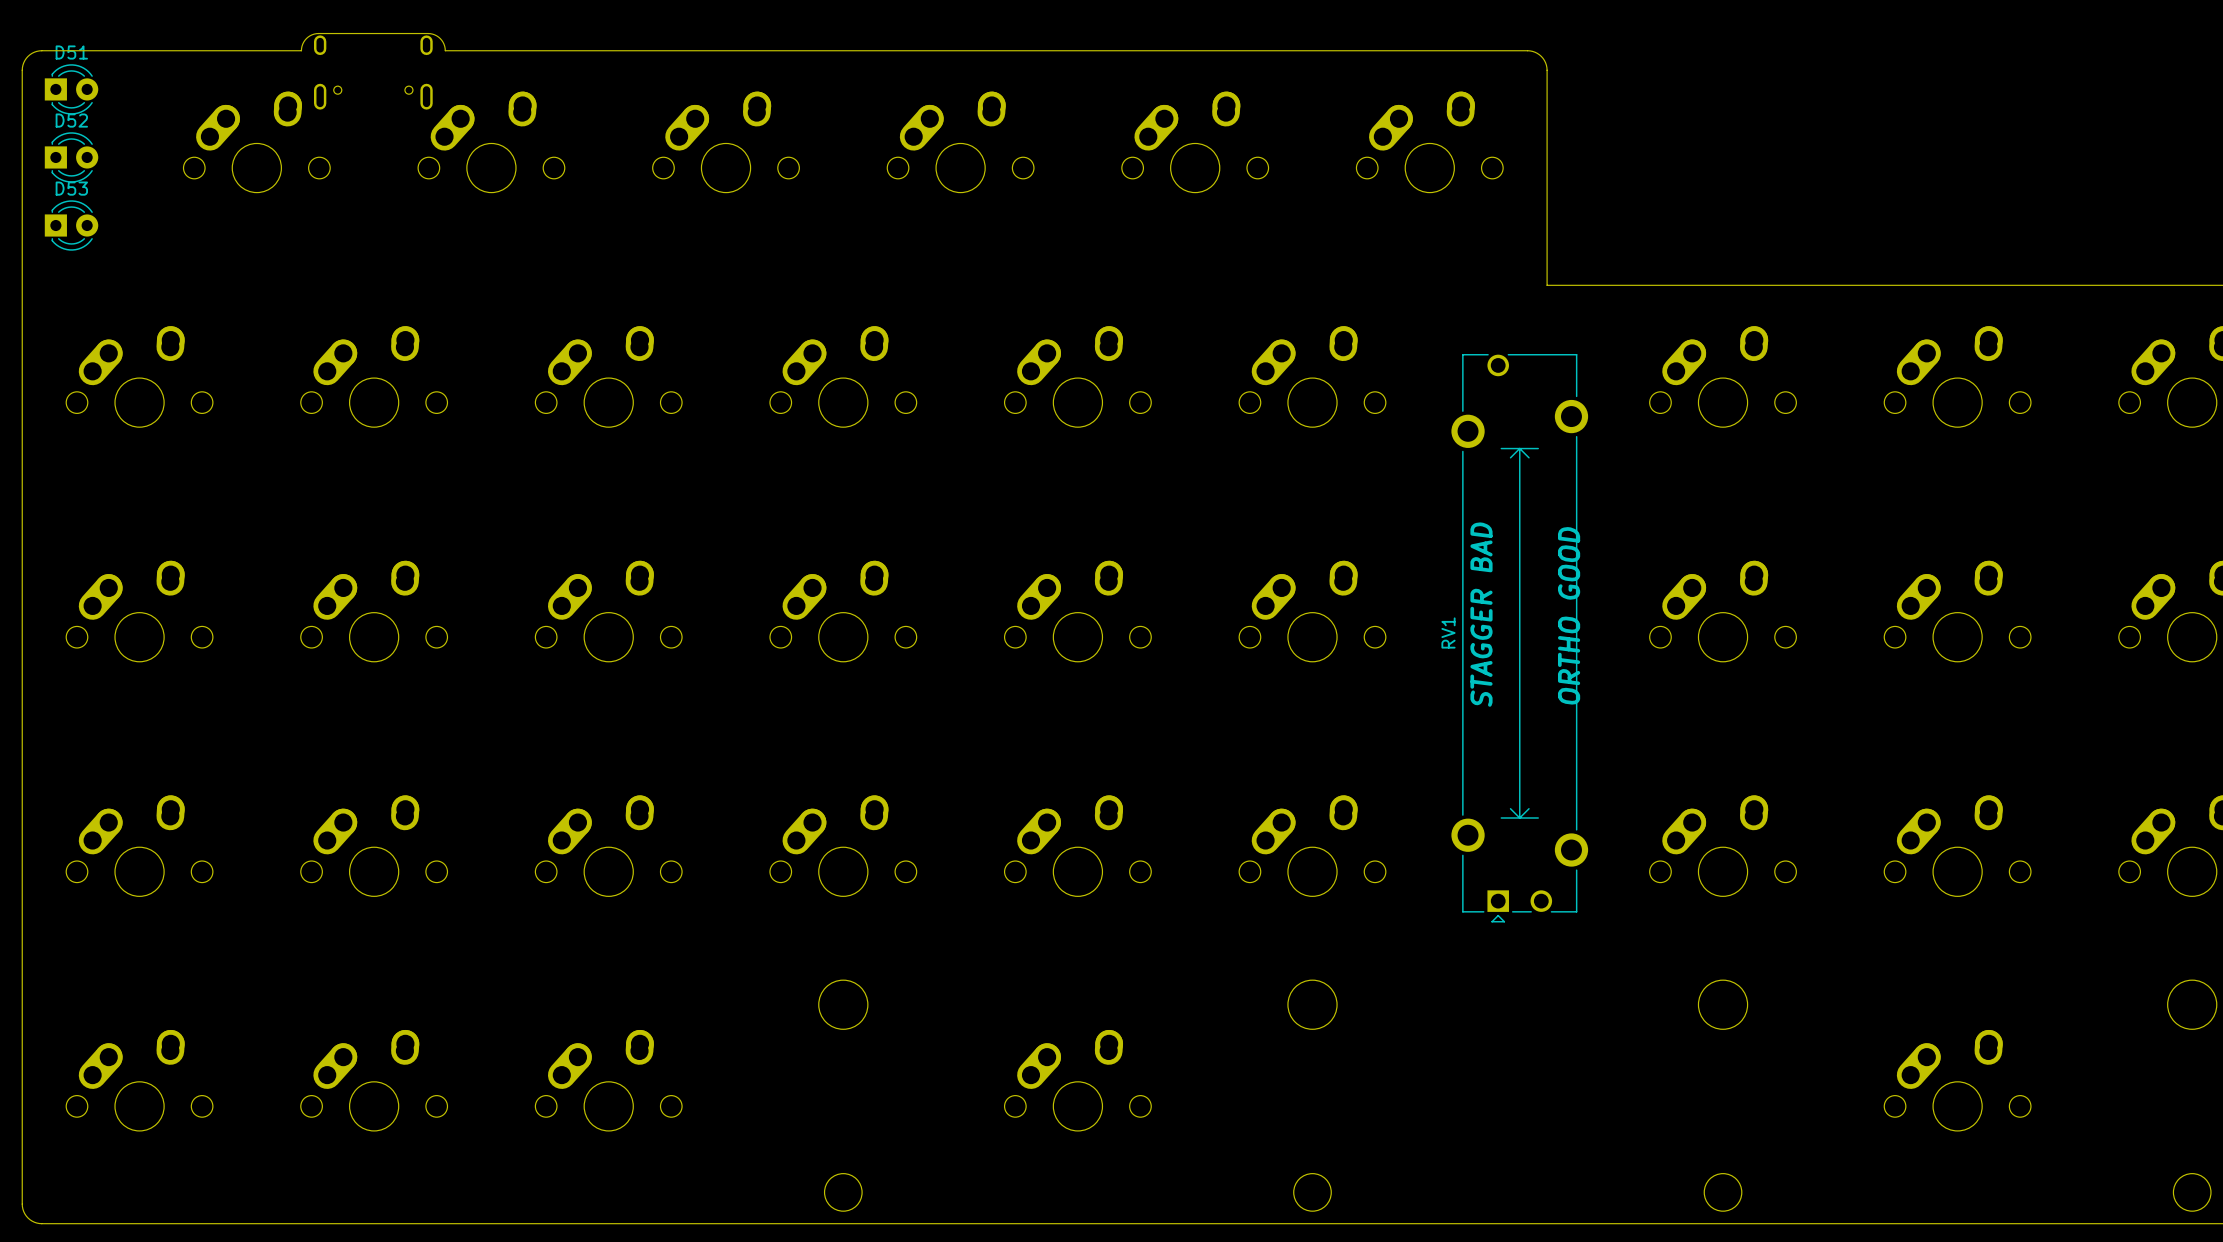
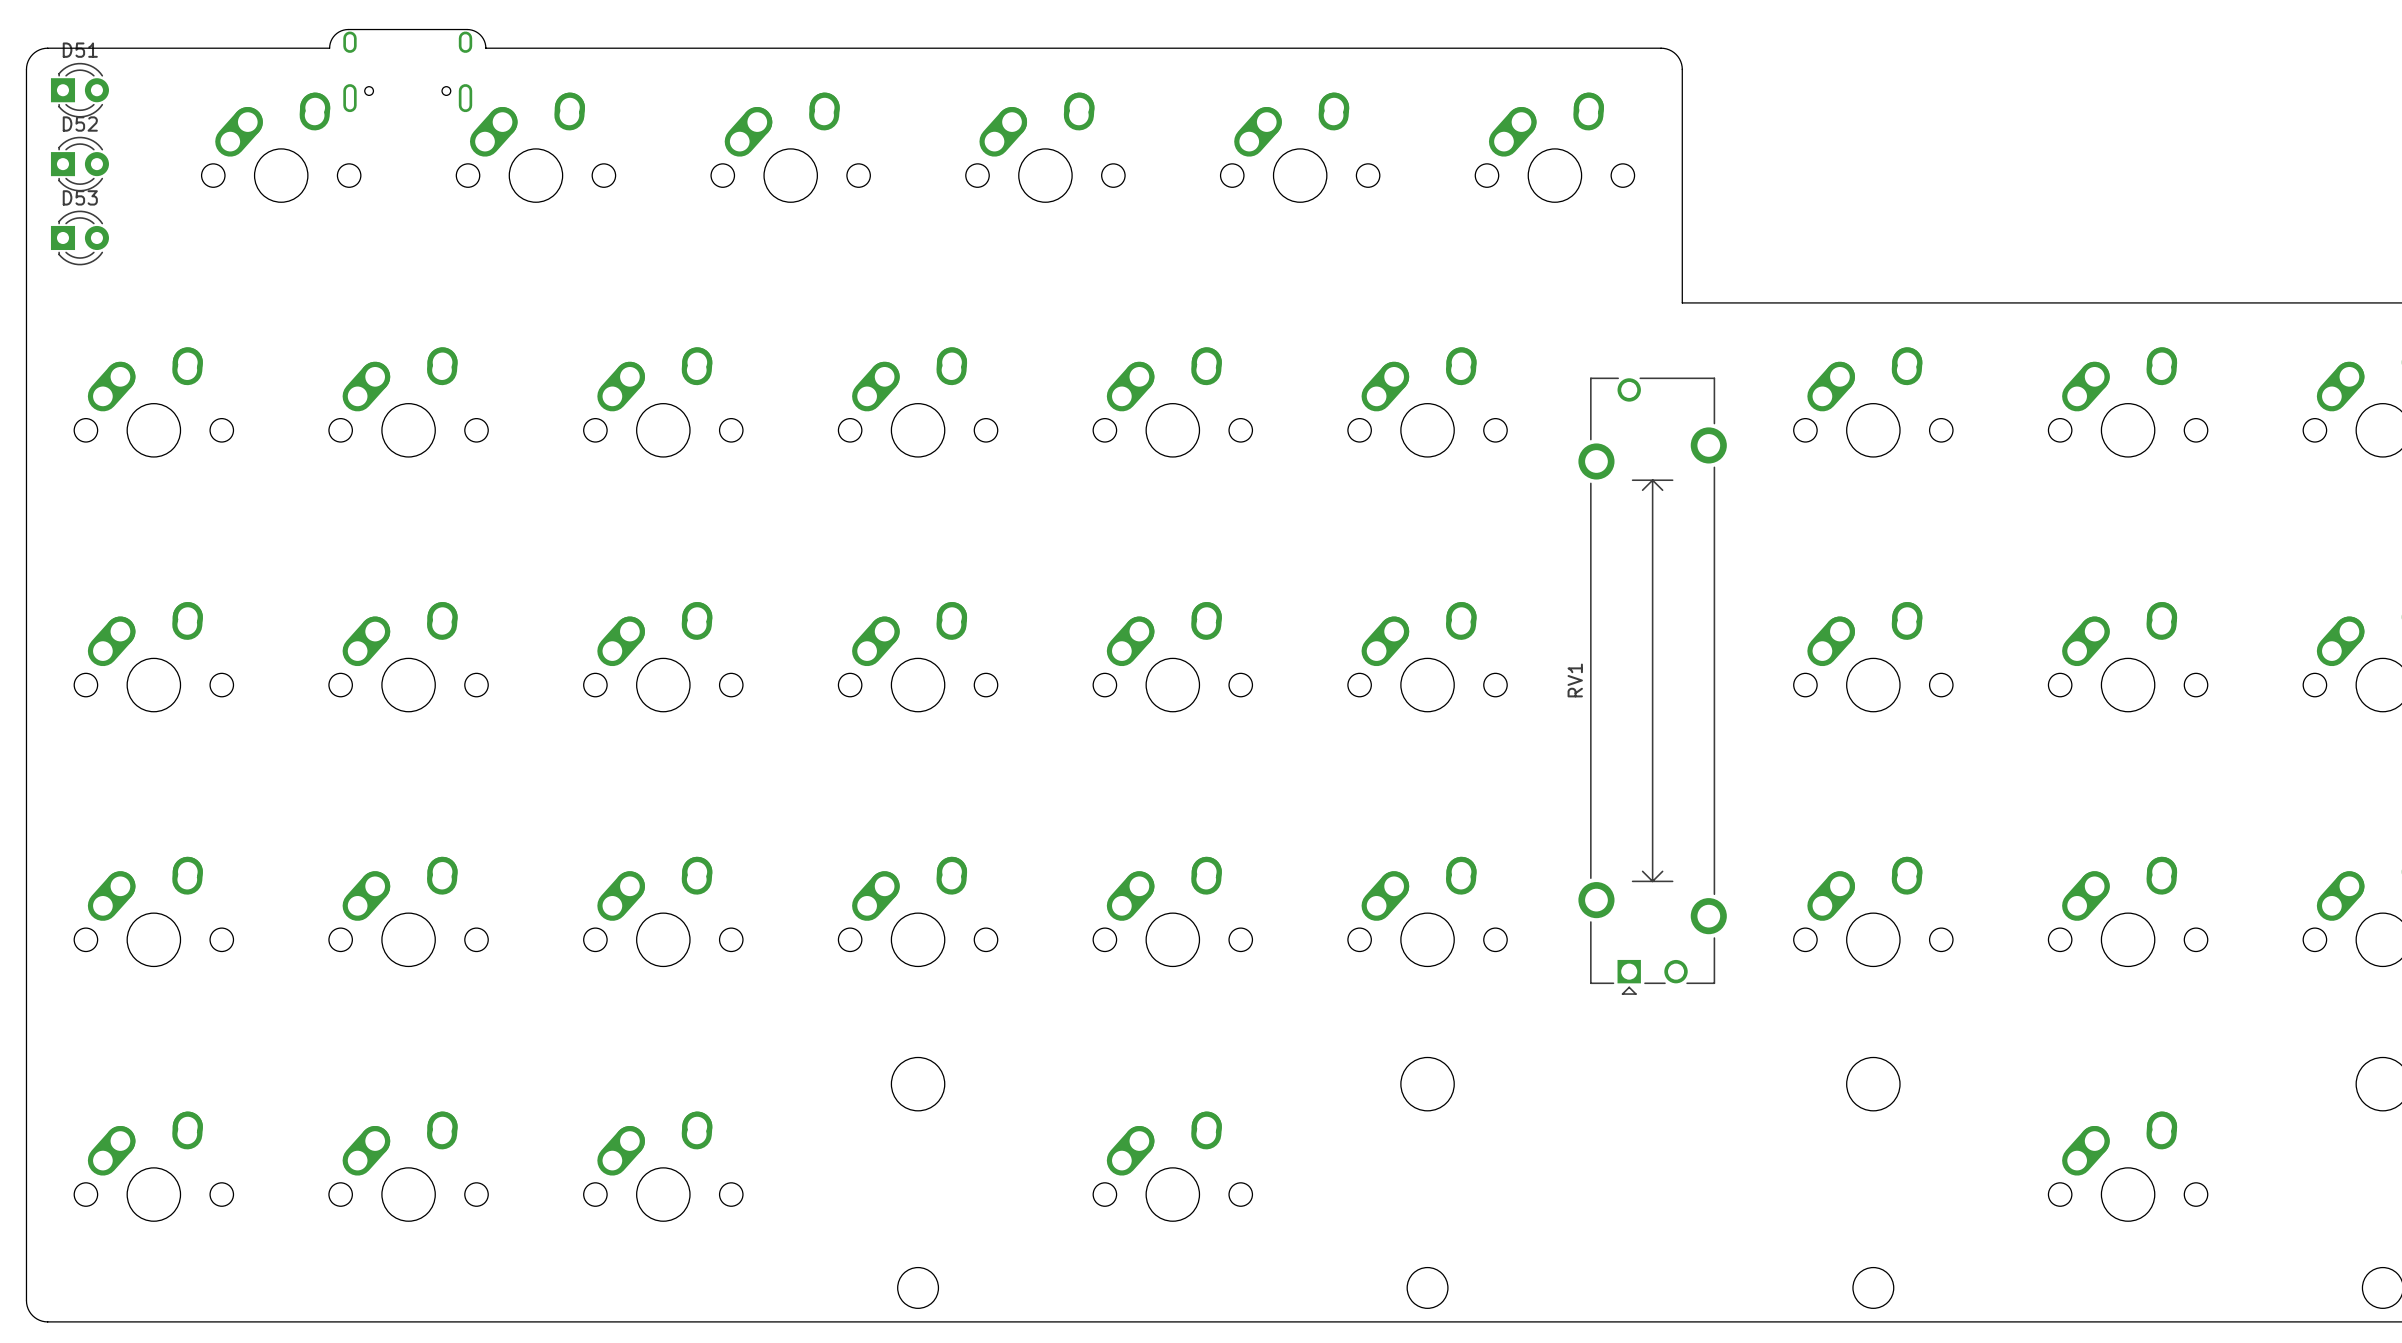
text: STAGGER BAD (1481, 614) -> none
text: ORTHO GOOD (1569, 615) -> none

